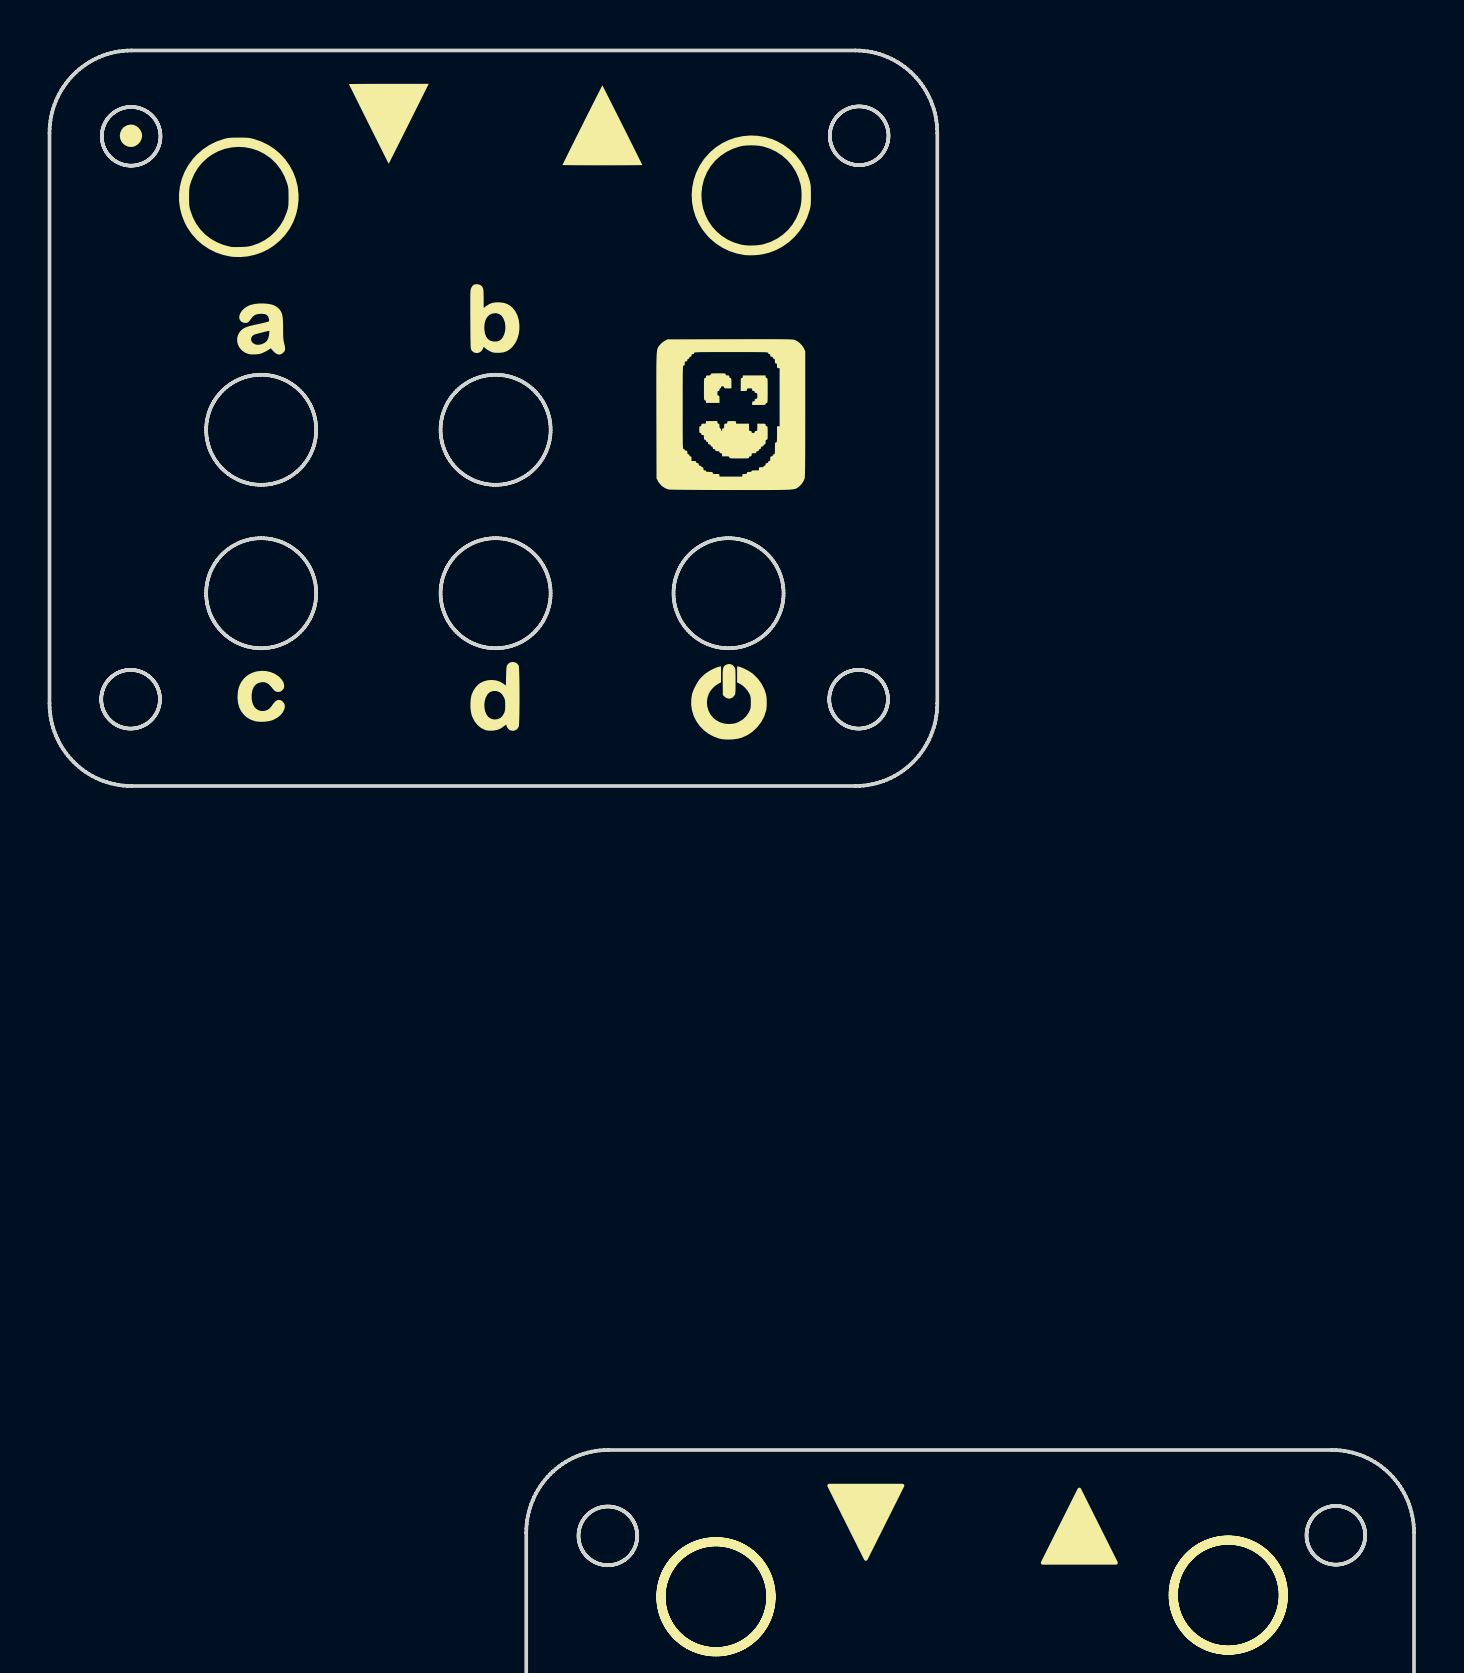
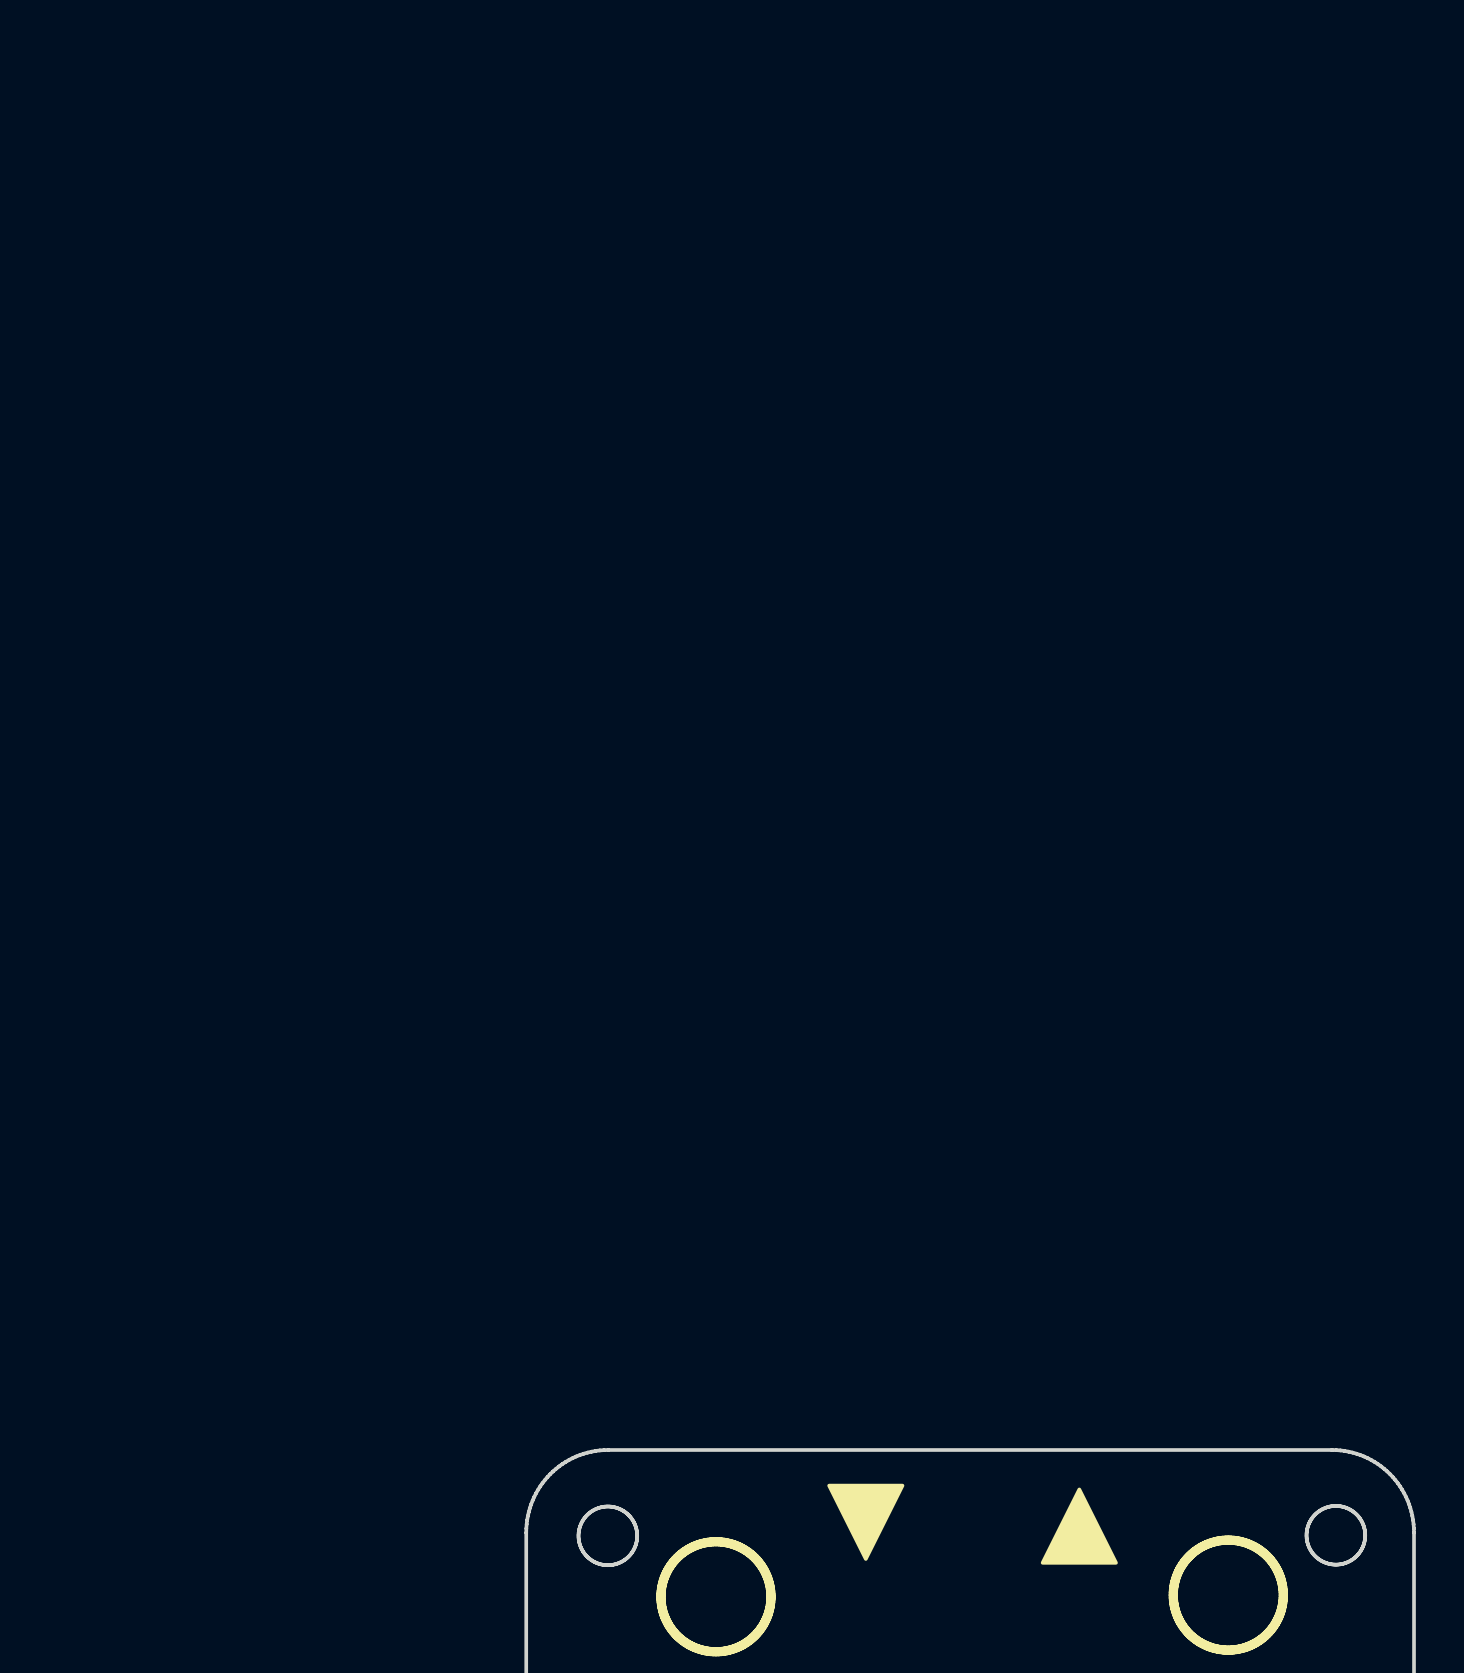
board edge: (131, 50) (859, 50) (887, 56) (910, 71) (923, 86) (930, 100) (935, 116) (937, 133) (937, 707) (930, 735) (916, 758) (901, 771) (887, 779) (871, 784) (855, 786) (127, 785) (99, 779) (76, 764) (65, 752) (57, 739) (52, 723) (49, 707) (49, 124) (57, 97) (65, 83) (76, 71) (88, 62) (103, 55) (131, 50) -> none
drawing: [119, 83, 811, 740] -> none
board edge: (129, 106) (118, 109) (109, 116) (103, 126) (101, 137) (104, 148) (111, 158) (121, 163) (132, 165) (143, 162) (152, 156) (158, 146) (160, 134) (157, 123) (150, 114) (141, 108) (129, 106) -> none
board edge: (857, 106) (846, 109) (837, 116) (831, 125) (829, 137) (832, 148) (839, 157) (849, 163) (860, 165) (871, 162) (880, 155) (886, 145) (888, 134) (885, 123) (878, 114) (869, 108) (857, 106) -> none
board edge: (258, 374) (279, 377) (298, 388) (310, 406) (316, 427) (312, 448) (301, 466) (284, 479) (263, 484) (242, 481) (224, 470) (211, 453) (206, 432) (209, 411) (220, 392) (237, 380) (258, 374) -> none
board edge: (492, 374) (514, 377) (532, 388) (545, 406) (550, 427) (547, 448) (536, 466) (519, 479) (498, 484) (477, 481) (458, 470) (445, 453) (440, 432) (443, 411) (454, 392) (472, 380) (492, 374) -> none
board edge: (258, 538) (279, 541) (298, 552) (310, 569) (316, 590) (312, 611) (301, 630) (284, 642) (263, 648) (242, 645) (224, 634) (211, 616) (206, 595) (209, 574) (220, 556) (237, 543) (258, 538) -> none
board edge: (492, 538) (514, 541) (532, 552) (545, 569) (550, 590) (547, 611) (536, 630) (519, 642) (498, 648) (477, 645) (458, 634) (445, 616) (440, 595) (443, 574) (454, 556) (472, 543) (492, 538) -> none
board edge: (725, 538) (747, 541) (765, 552) (778, 569) (783, 590) (780, 611) (769, 630) (752, 642) (731, 648) (709, 645) (691, 634) (678, 616) (673, 595) (676, 574) (687, 556) (705, 543) (725, 538) -> none
board edge: (129, 669) (140, 671) (150, 677) (157, 686) (159, 697) (158, 709) (152, 718) (143, 725) (132, 728) (120, 726) (110, 720) (104, 711) (101, 700) (102, 689) (108, 679) (118, 672) (129, 669) -> none
board edge: (857, 669) (846, 672) (836, 679) (830, 689) (829, 700) (832, 711) (838, 720) (848, 726) (860, 728) (871, 725) (880, 718) (886, 709) (887, 697) (885, 686) (878, 677) (868, 671) (857, 669) -> none

